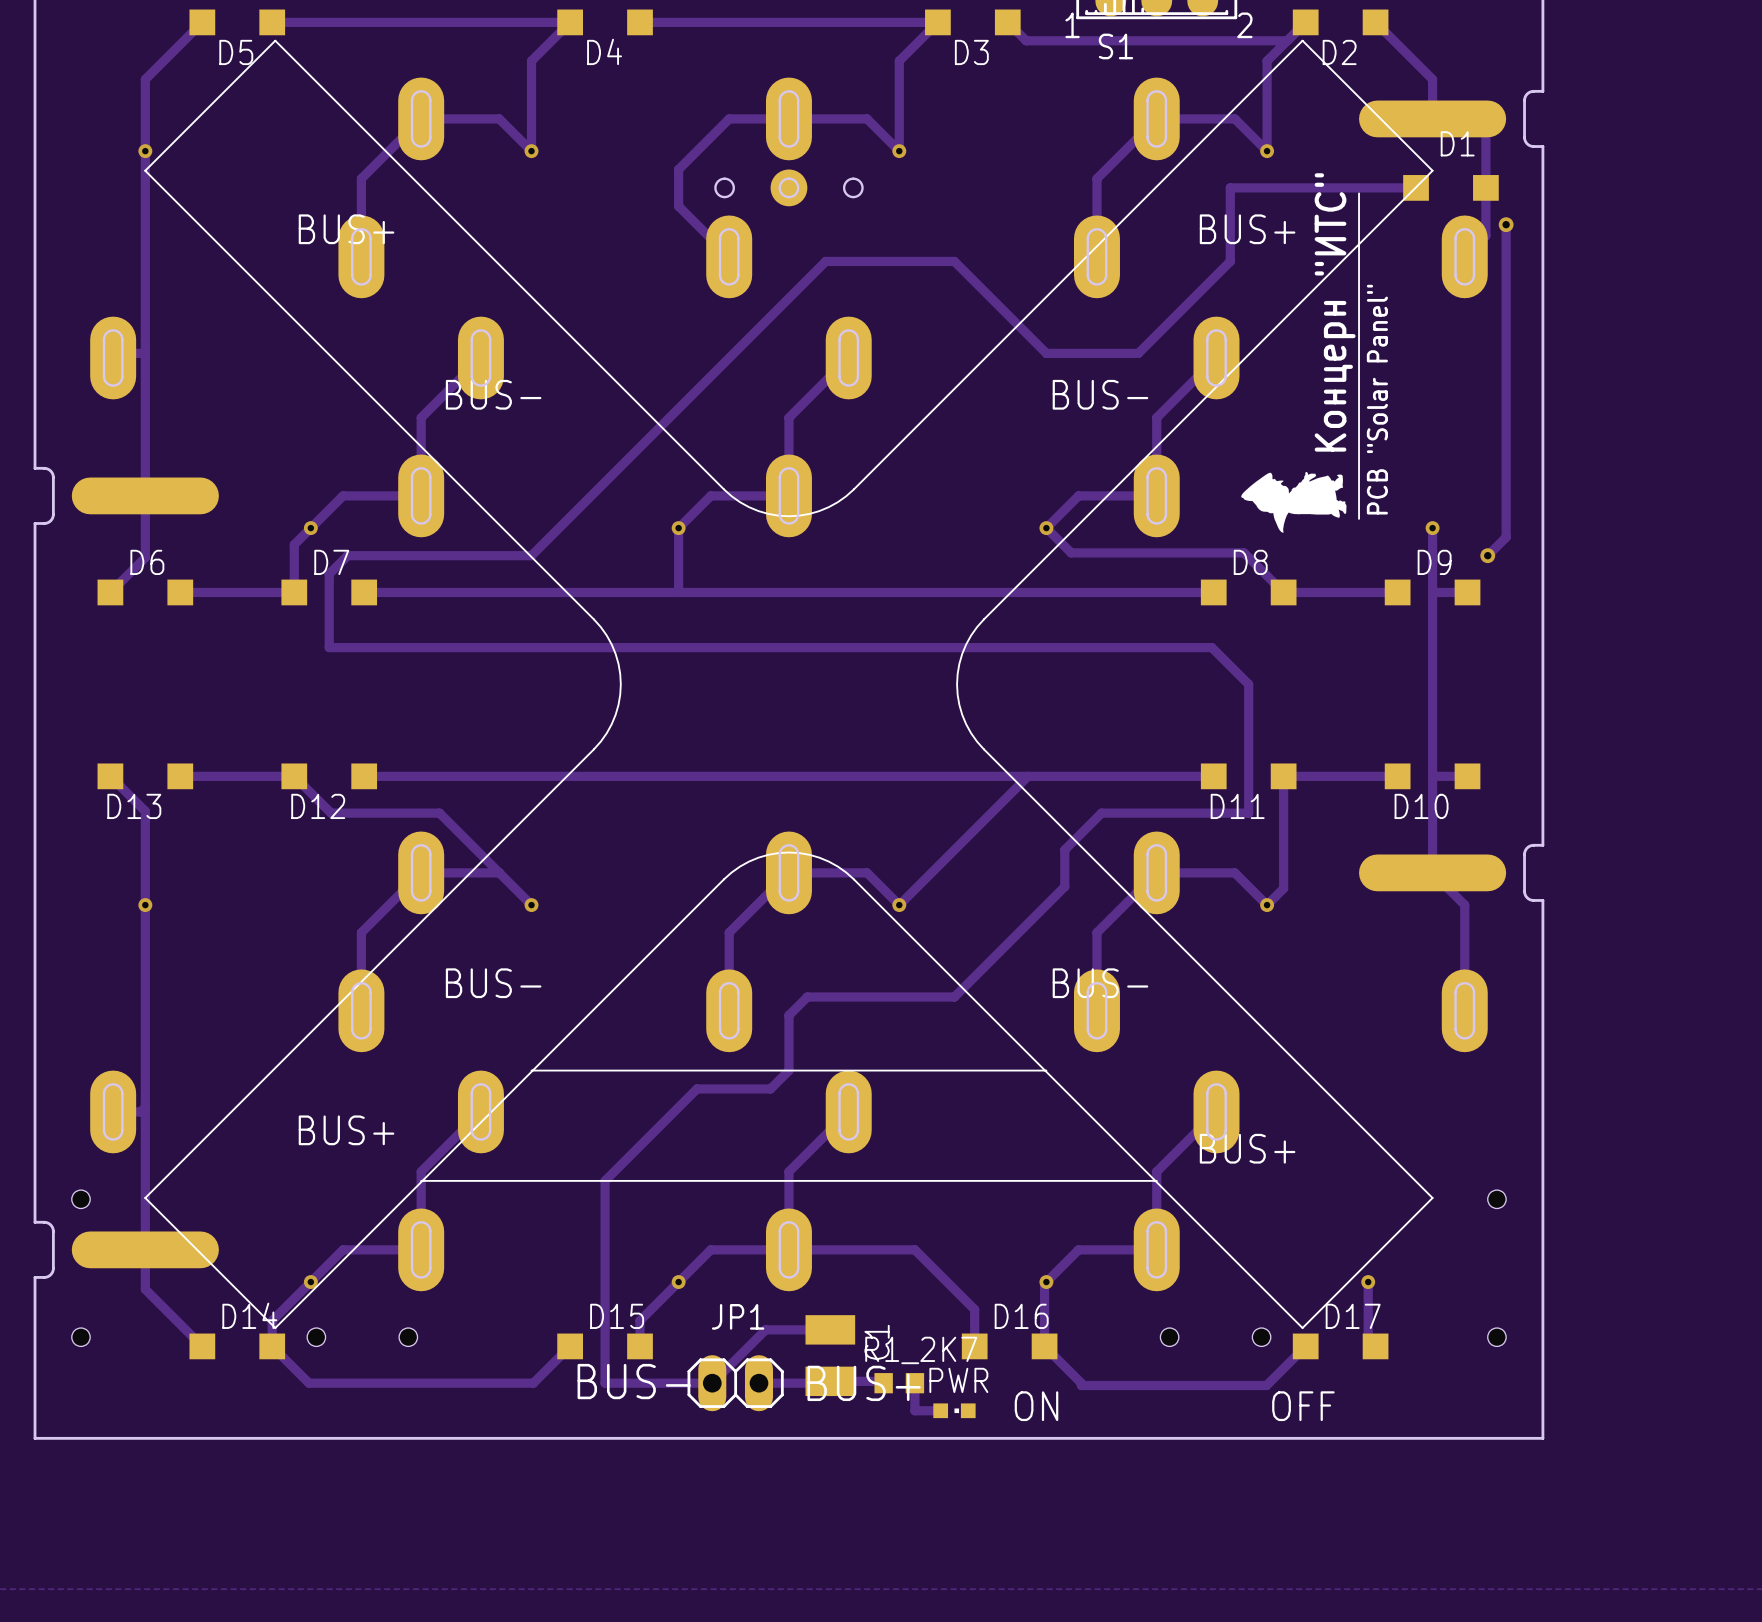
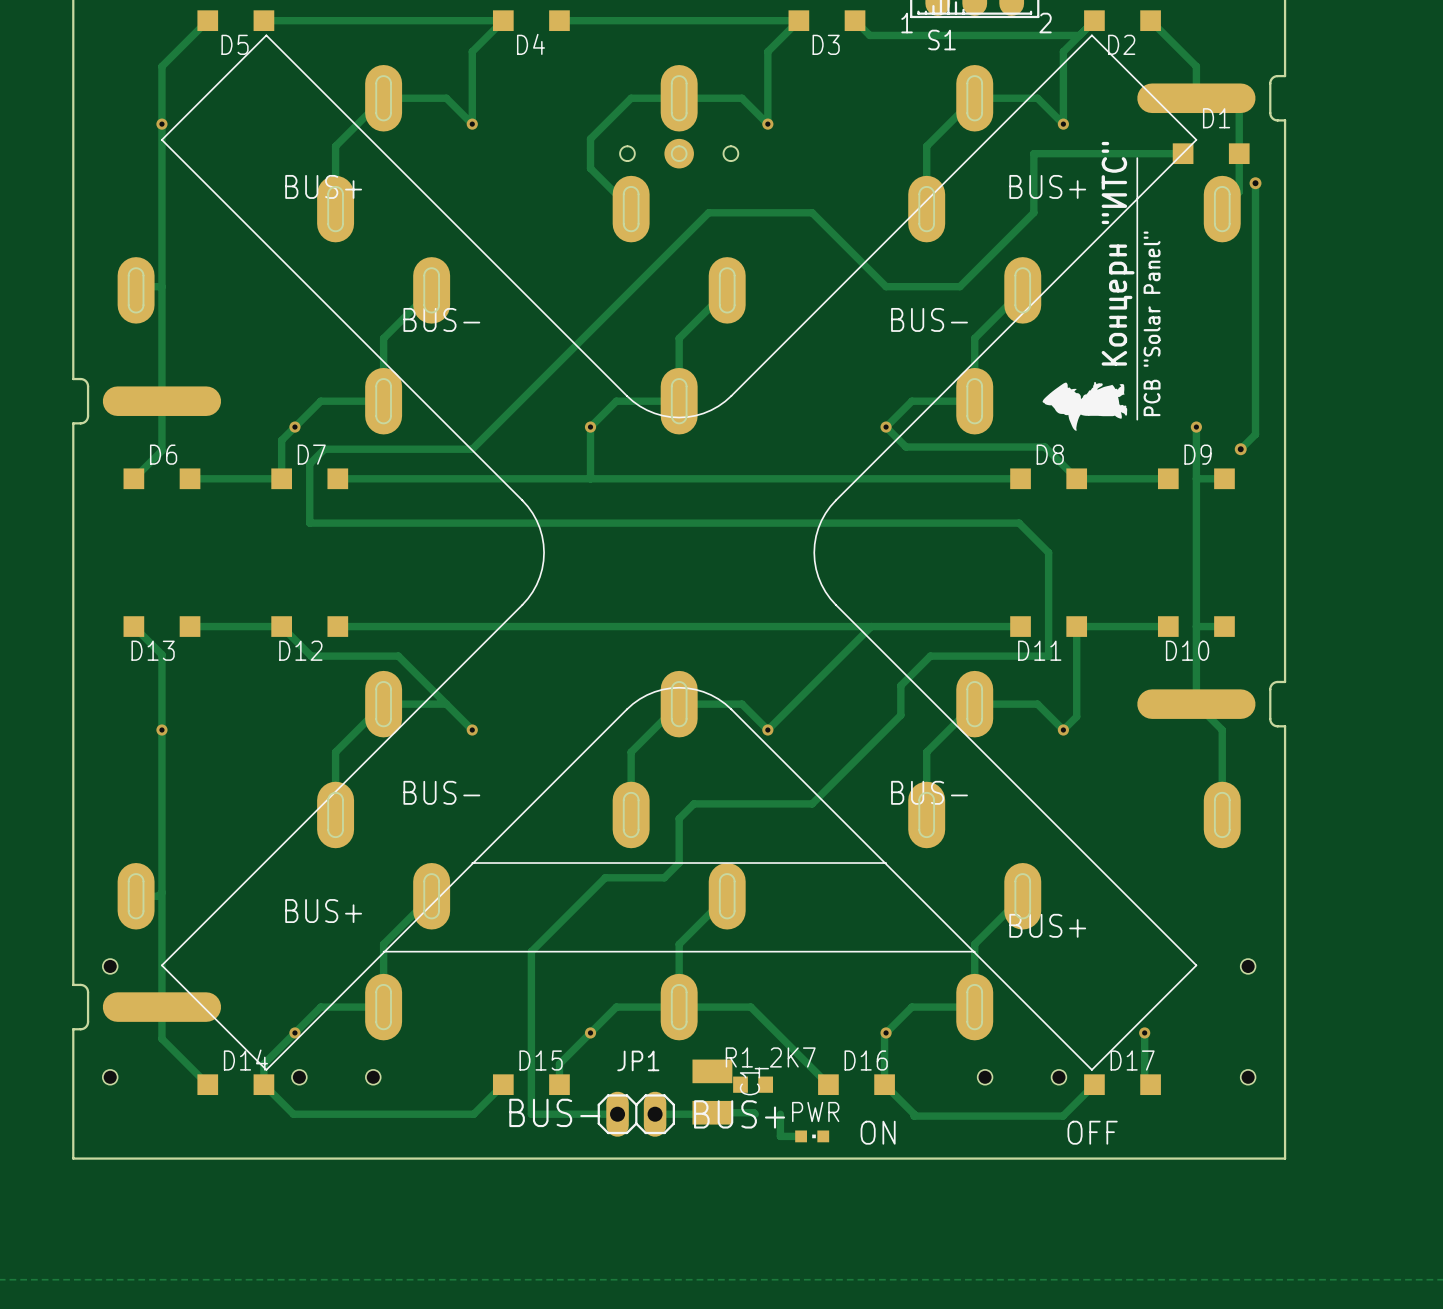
track: (878, 1249) (914, 1249) (974, 1309) (974, 1346) -> (750, 1007) (828, 1084)
track: (830, 1329) (765, 1329) (712, 1383) -> none
R1_2K7 position: (899, 1383) -> (753, 1084)

